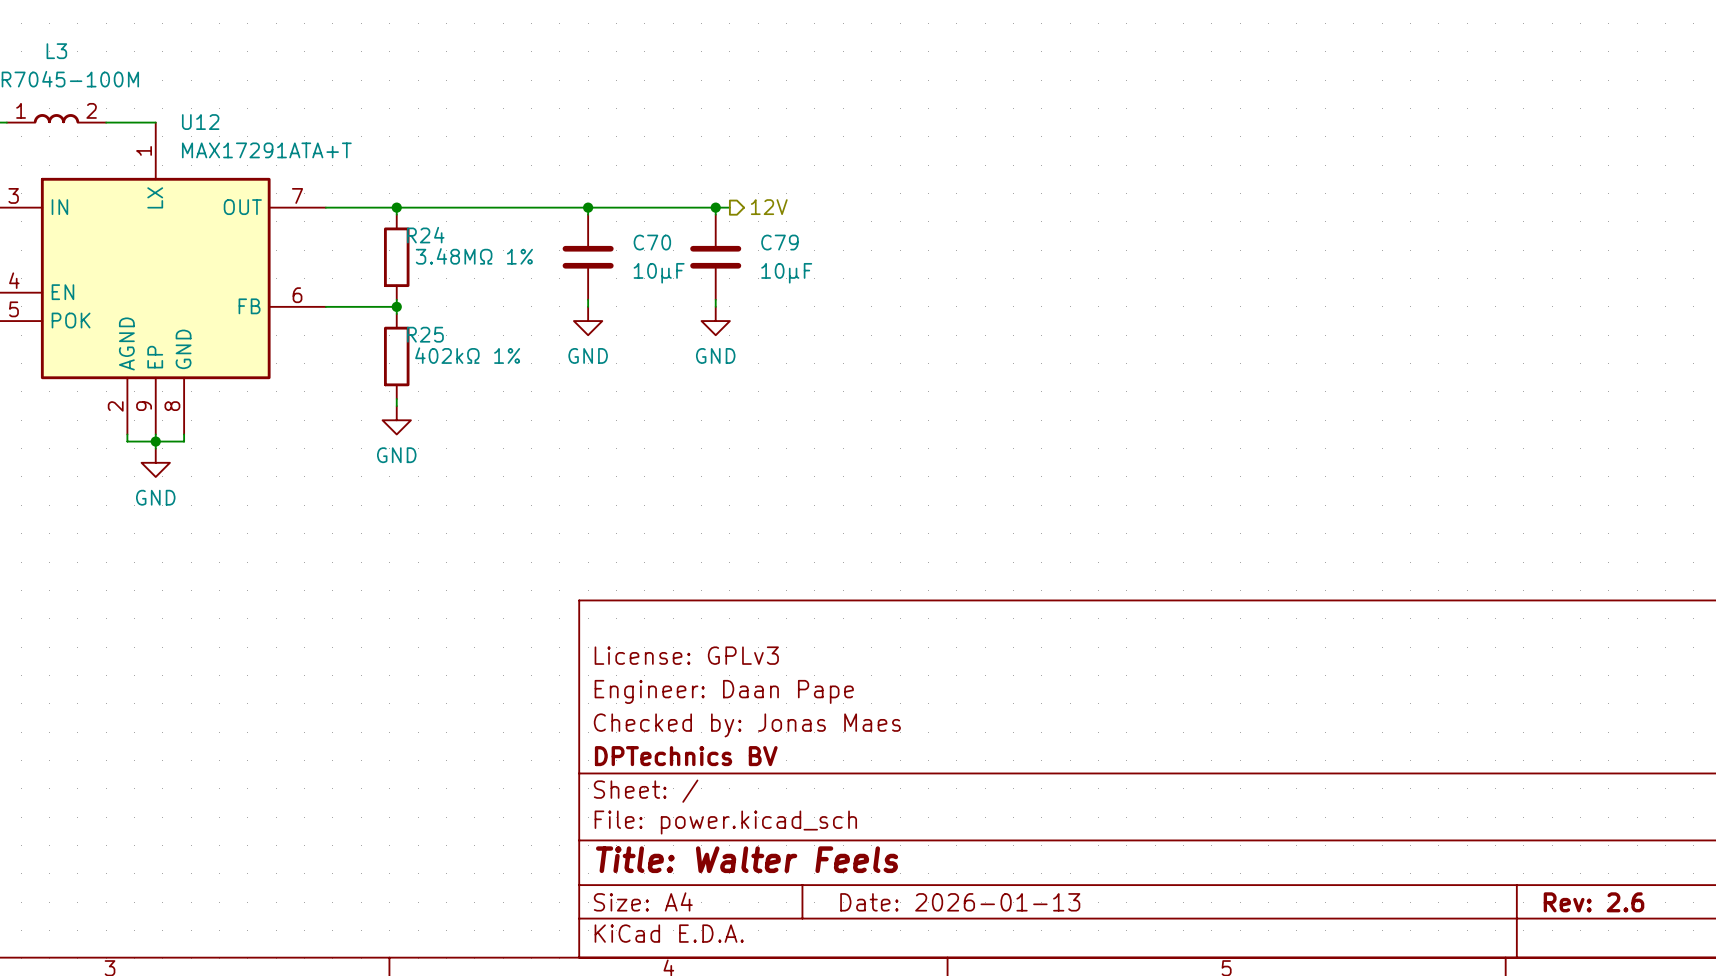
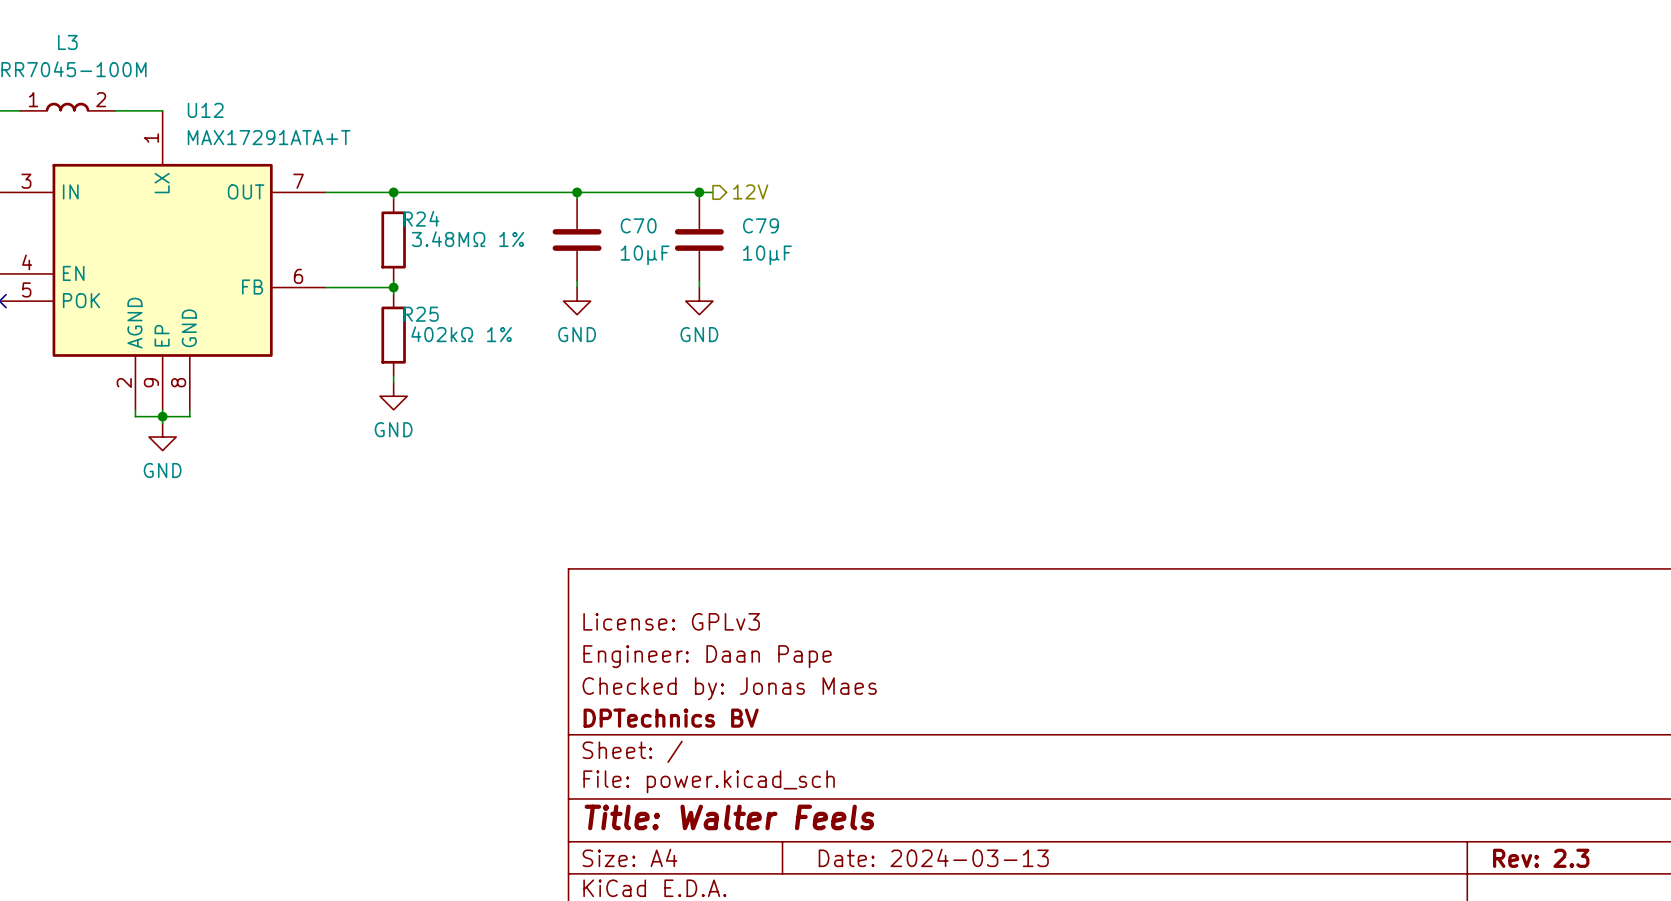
title block: Date: 2026-01-13 (960, 902) -> Date: 2024-03-13 (933, 857)
title block: Rev: 2.6 (1594, 902) -> Rev: 2.3 (1541, 858)

